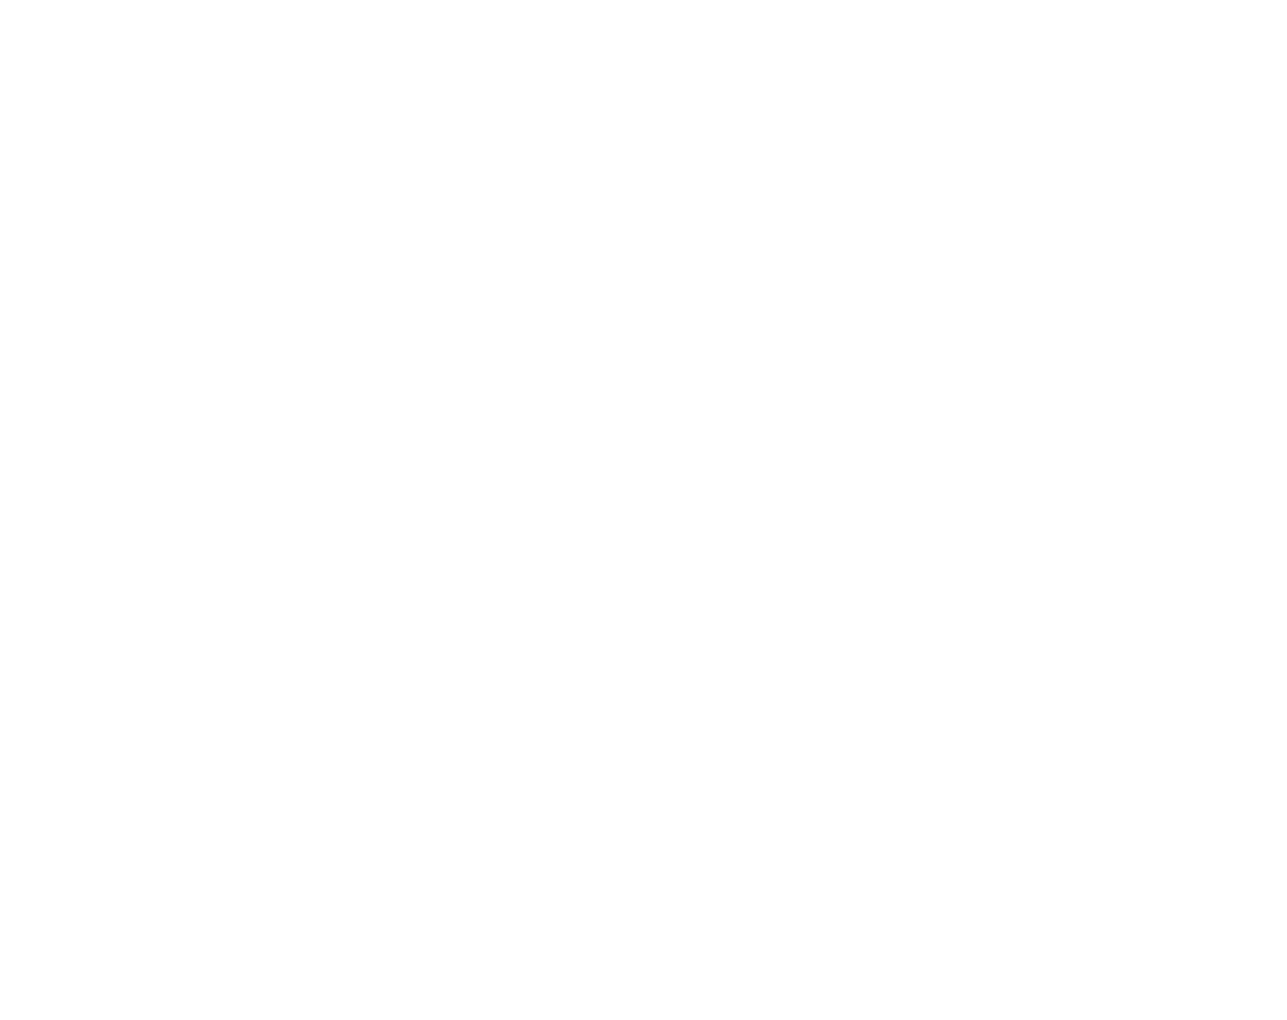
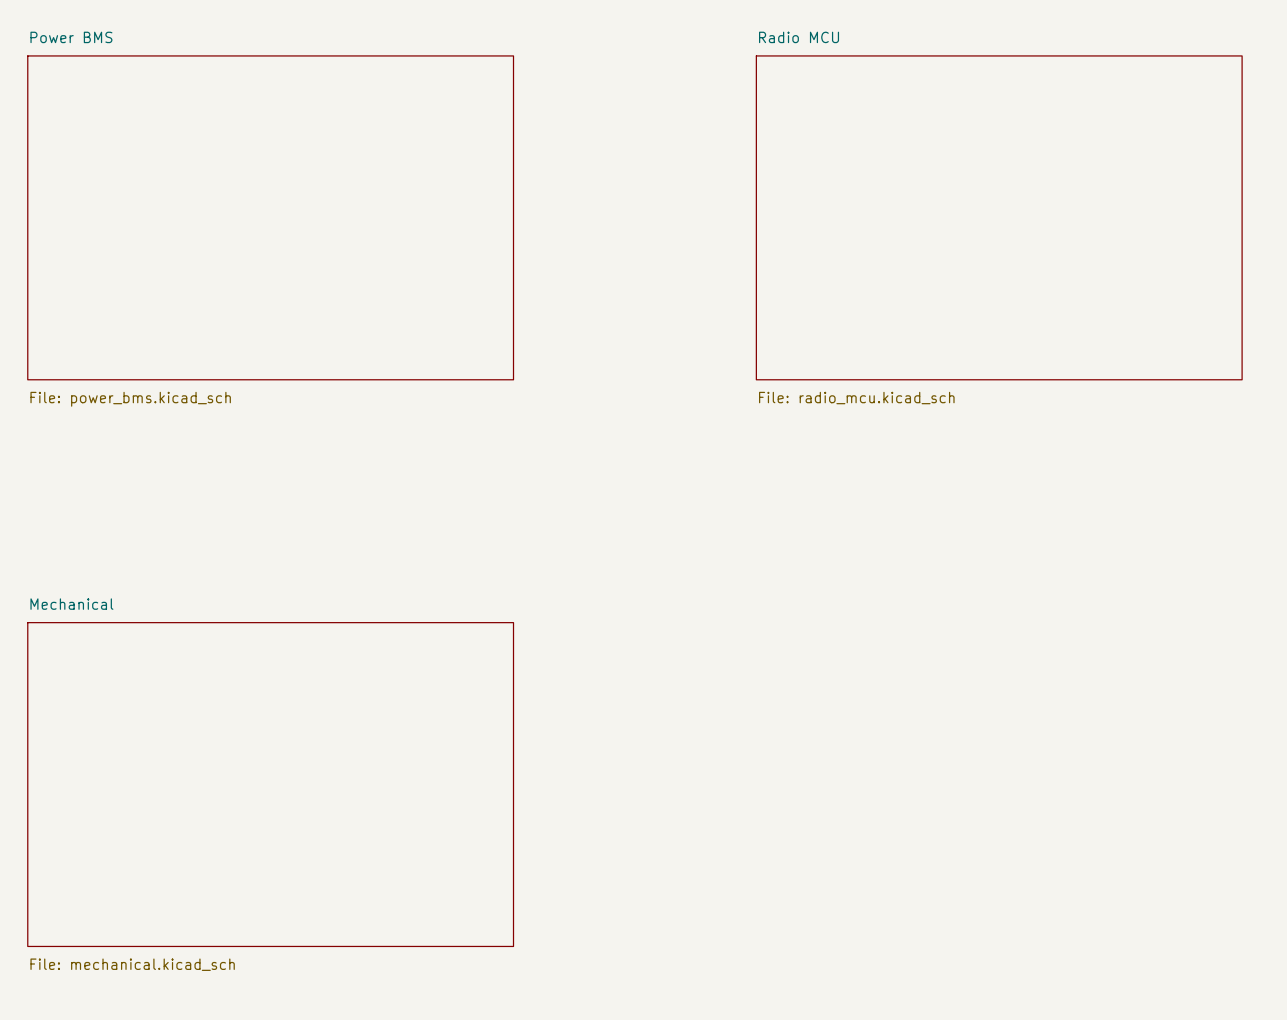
sheet Power BMS: none -> File: power_bms.kicad_sch (270, 217)
sheet Radio MCU: none -> File: radio_mcu.kicad_sch (999, 217)
sheet Mechanical: none -> File: mechanical.kicad_sch (270, 784)

